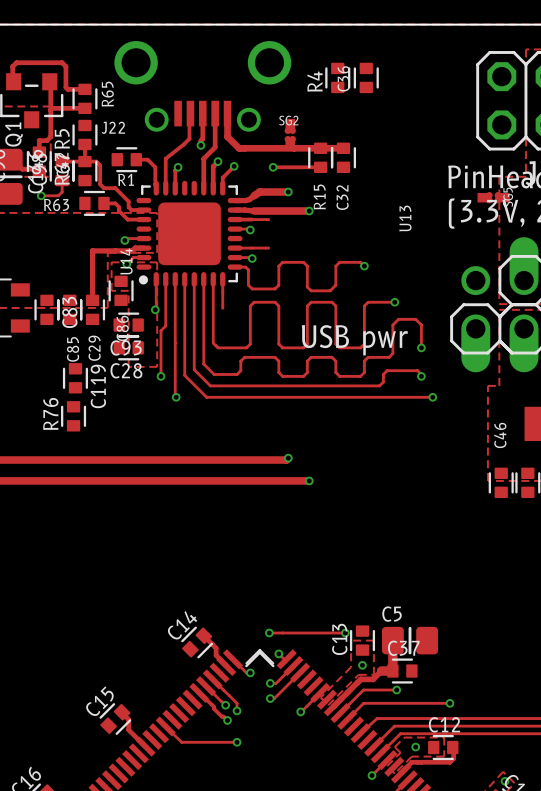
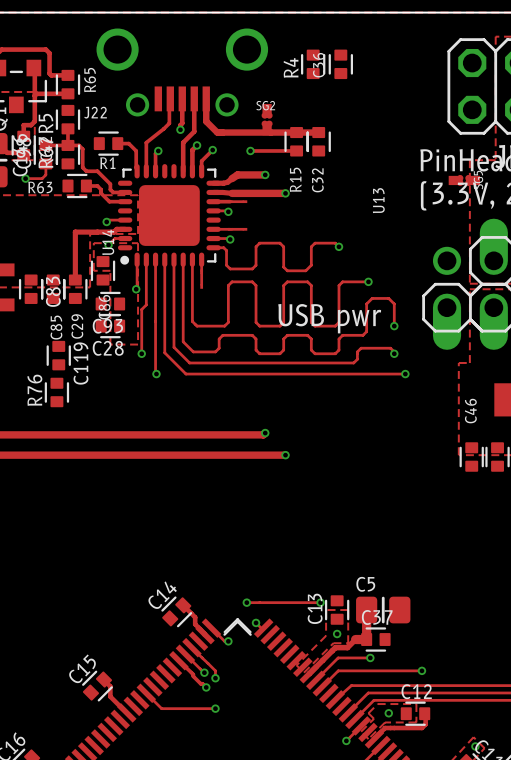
track: (293, 666) (276, 683) (270, 683) -> none
track: (300, 672) (274, 698) (270, 698) -> none
via: (270, 683) -> none
track: (320, 692) (300, 711) -> none
via: (270, 698) -> none
via: (300, 711) -> none

